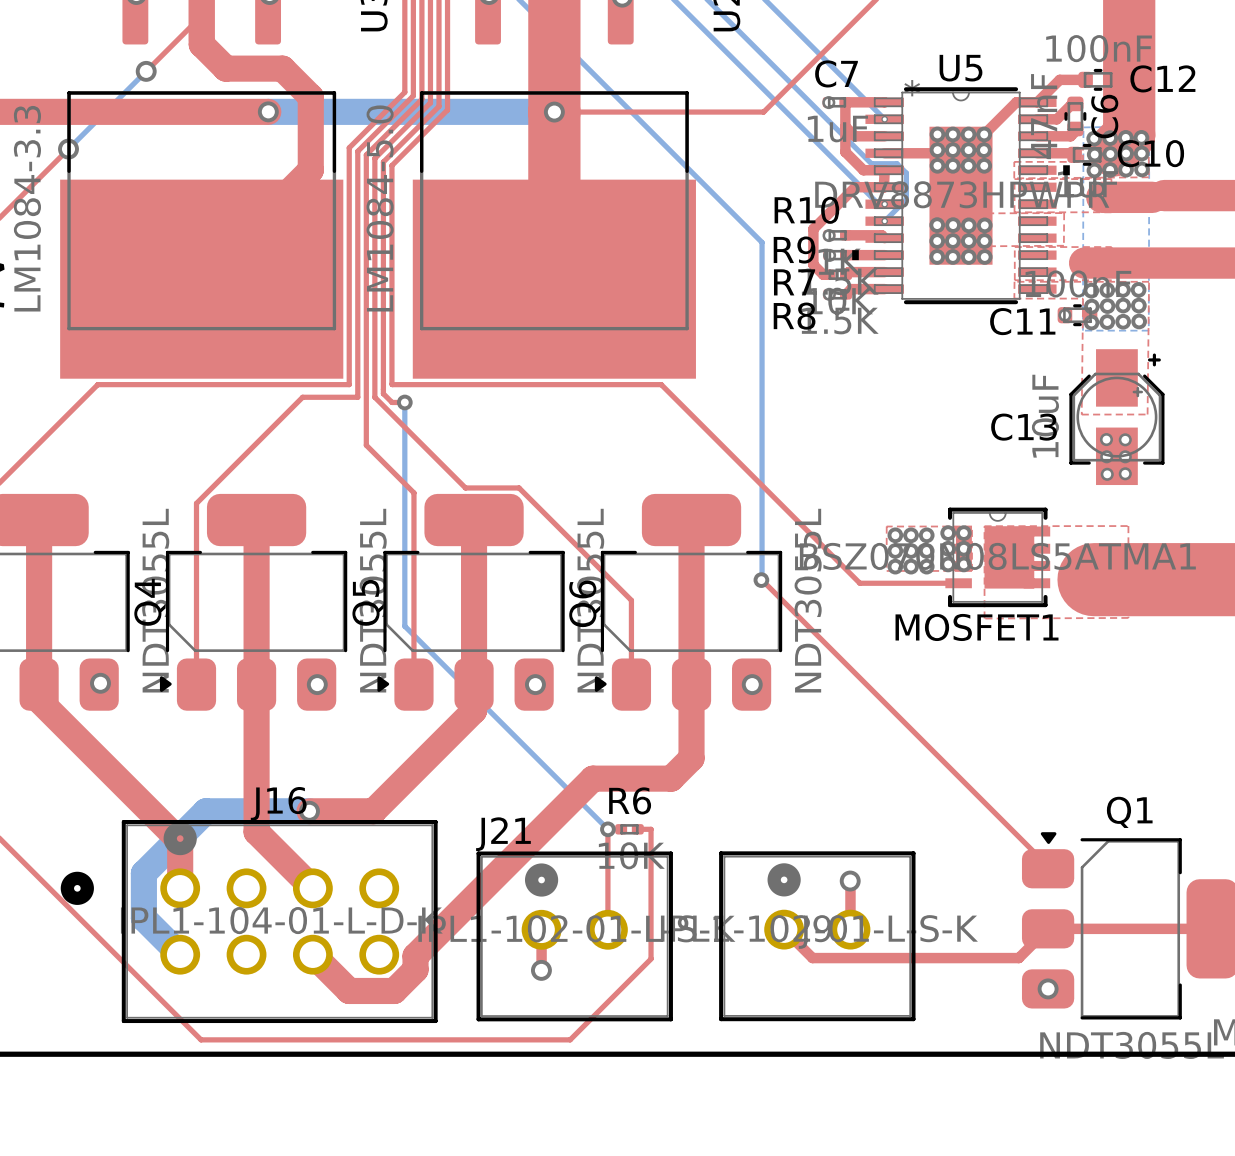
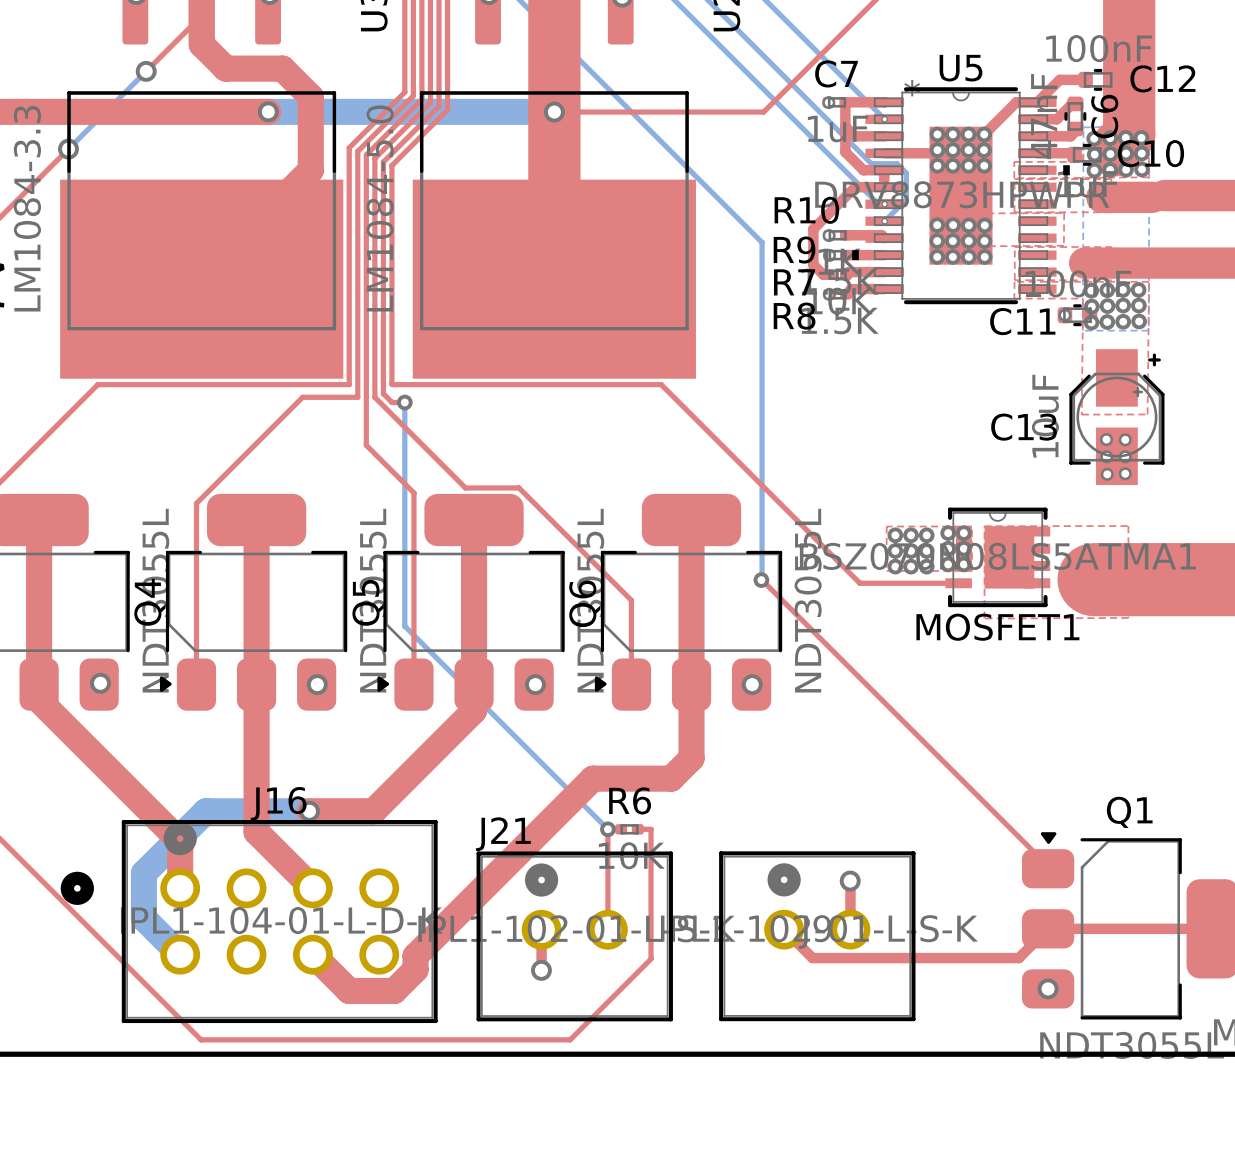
MOSFET1 name position: MOSFET1 (977, 627) -> MOSFET1 (997, 627)

